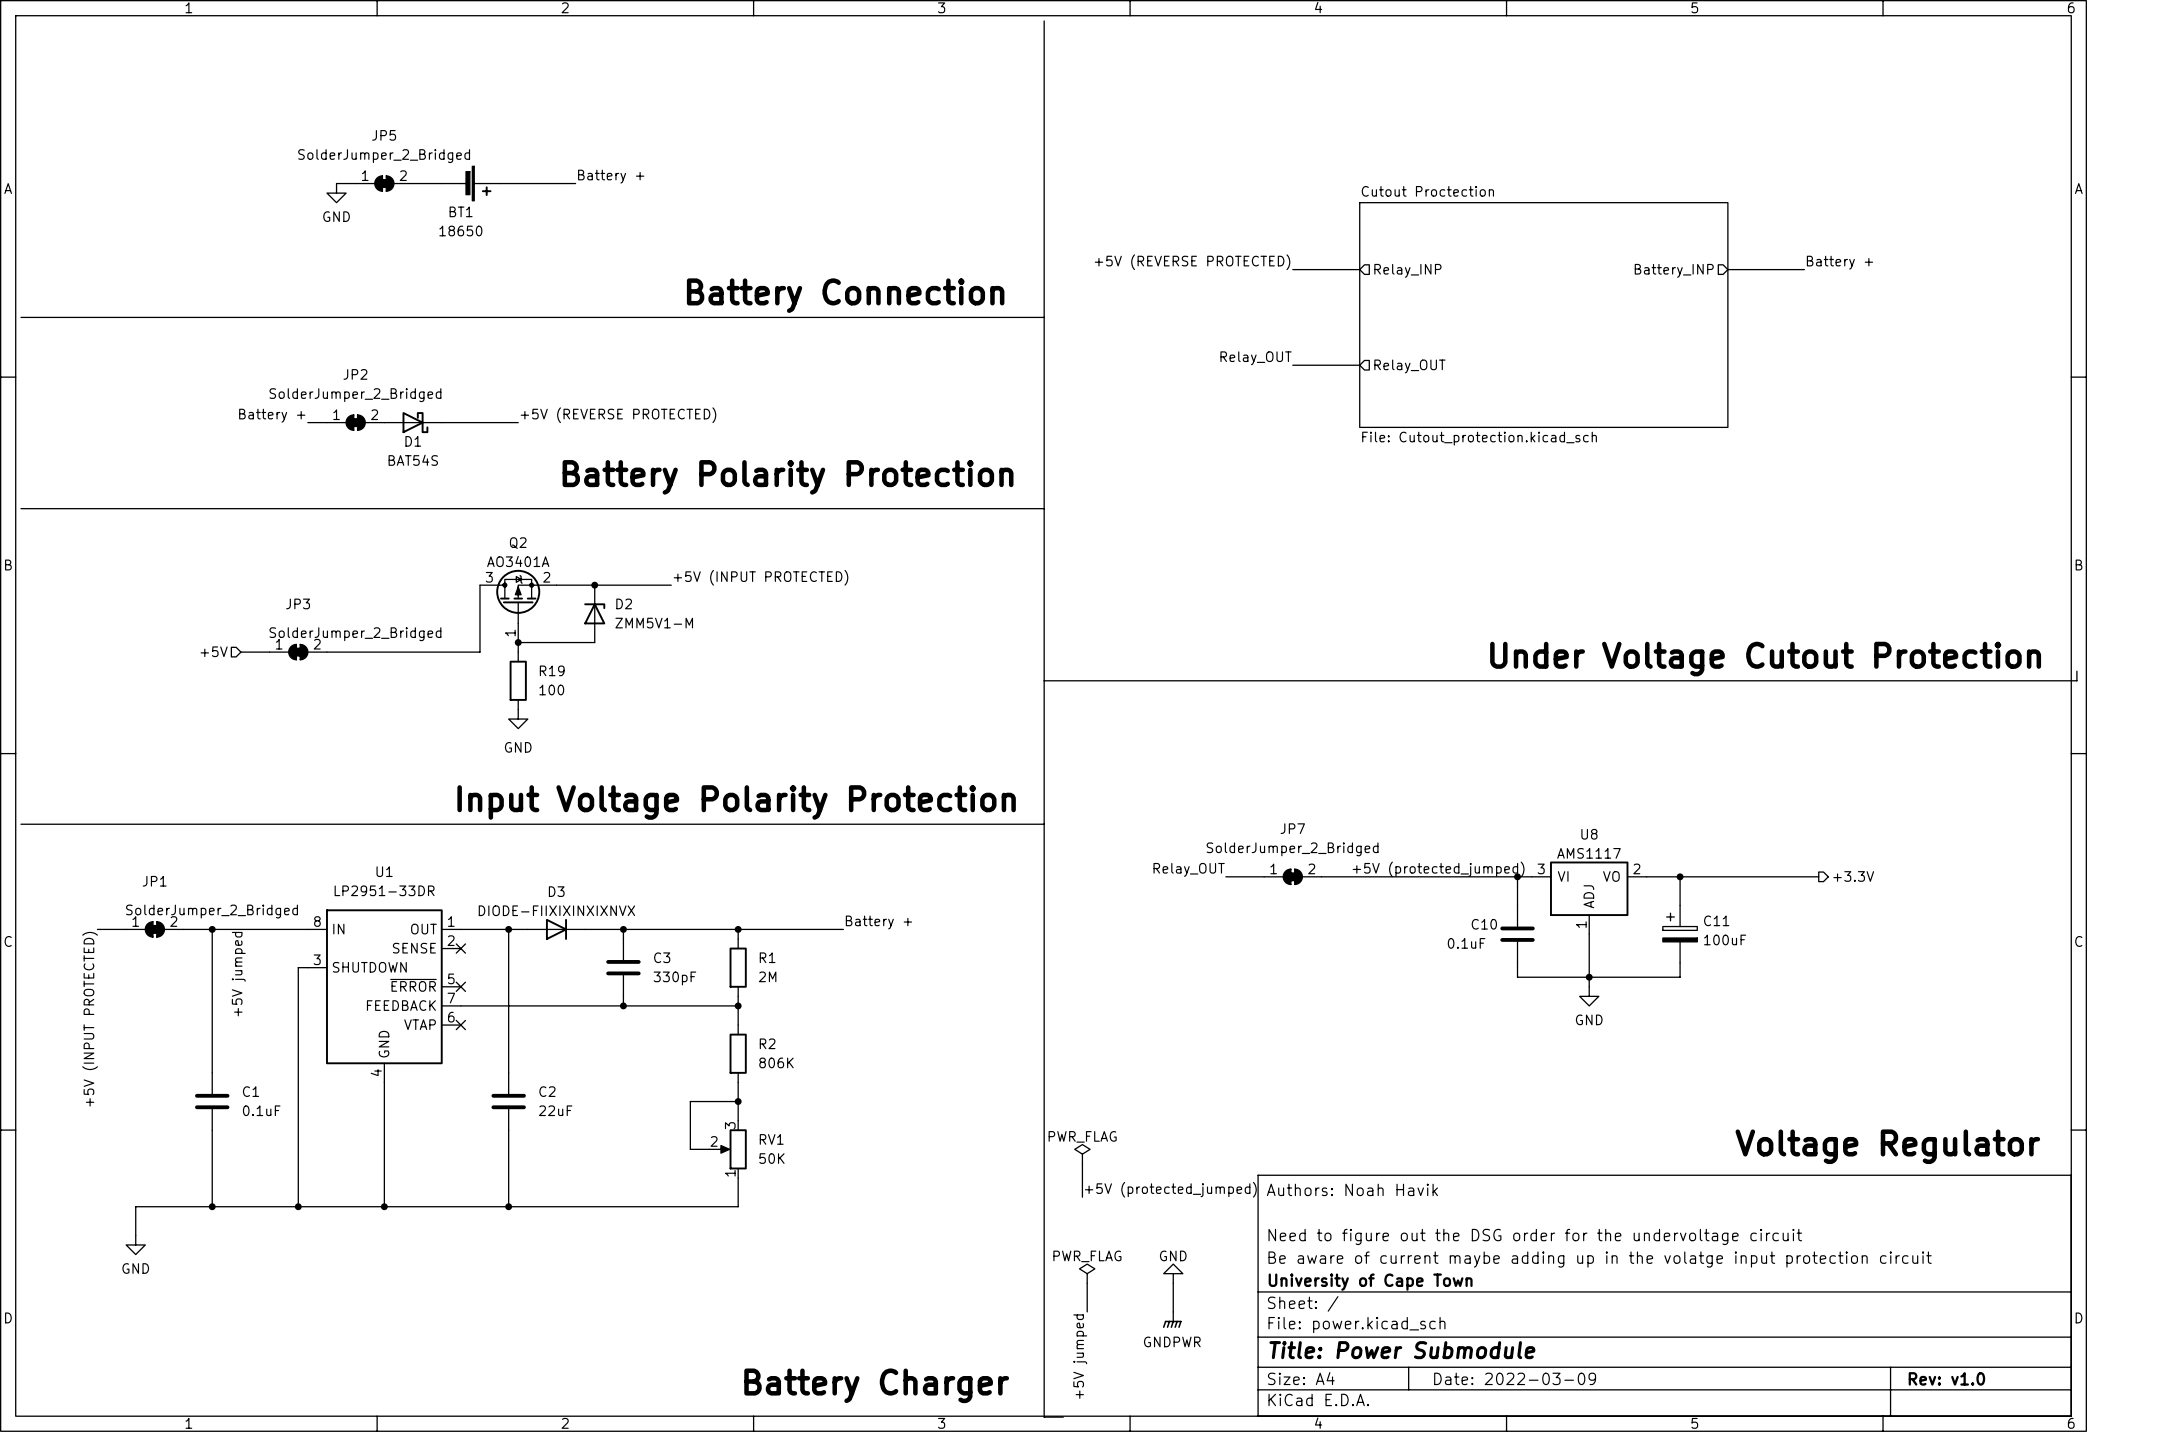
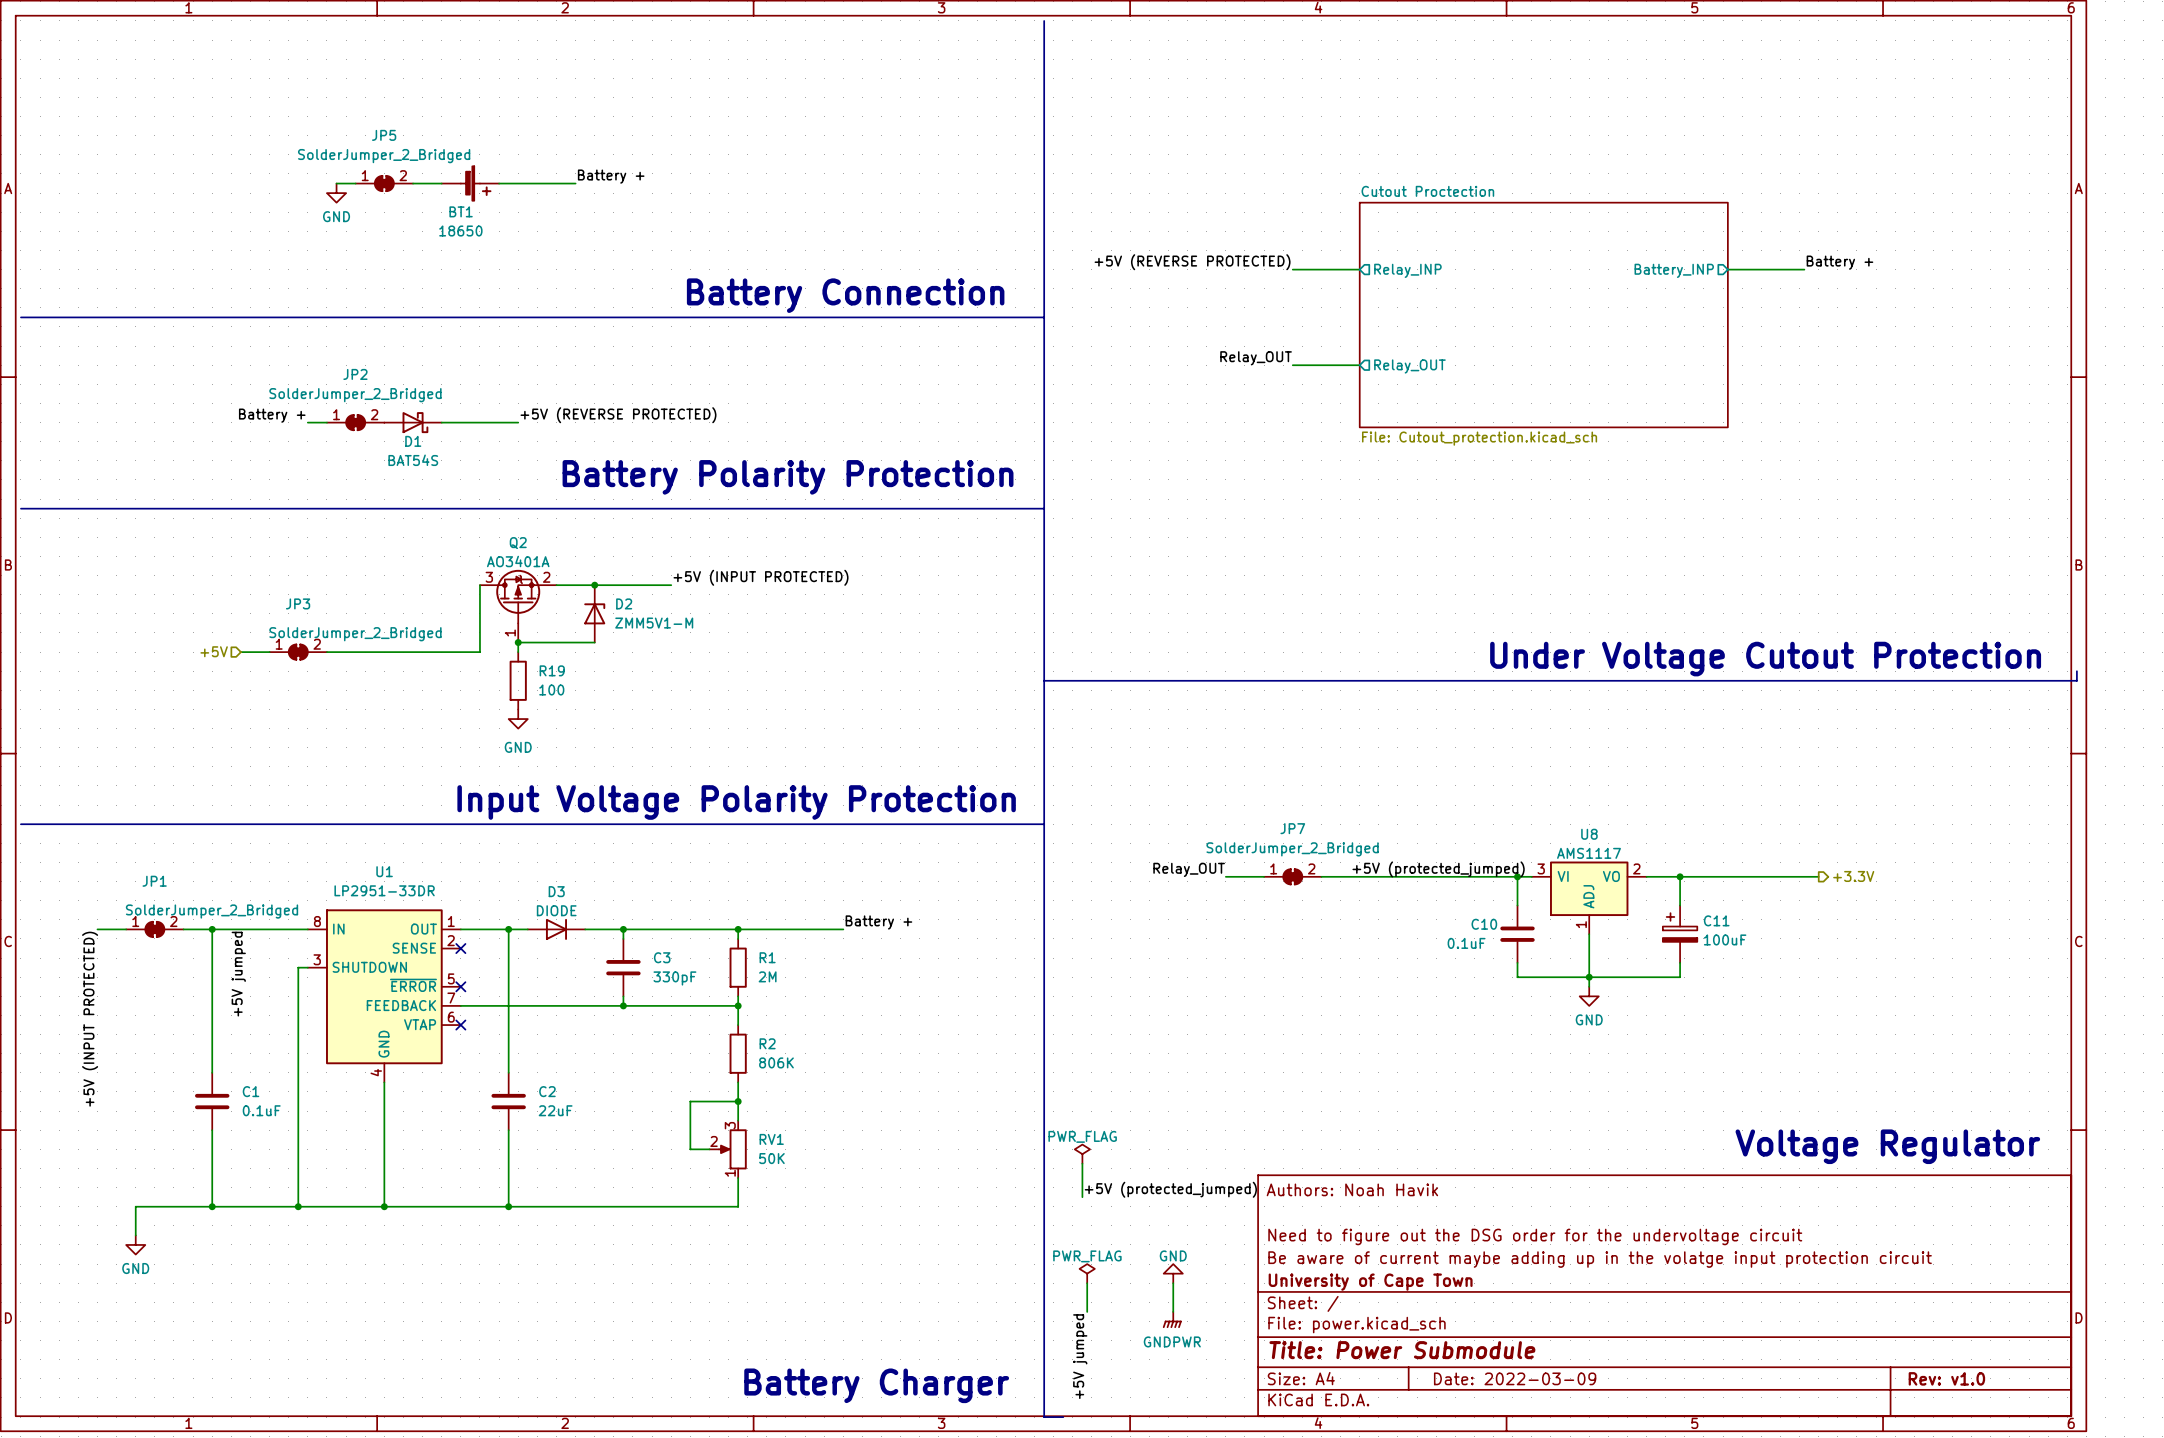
D3 value: DIODE-FIIXIXINXIXNVX (556, 910) -> DIODE (556, 910)

